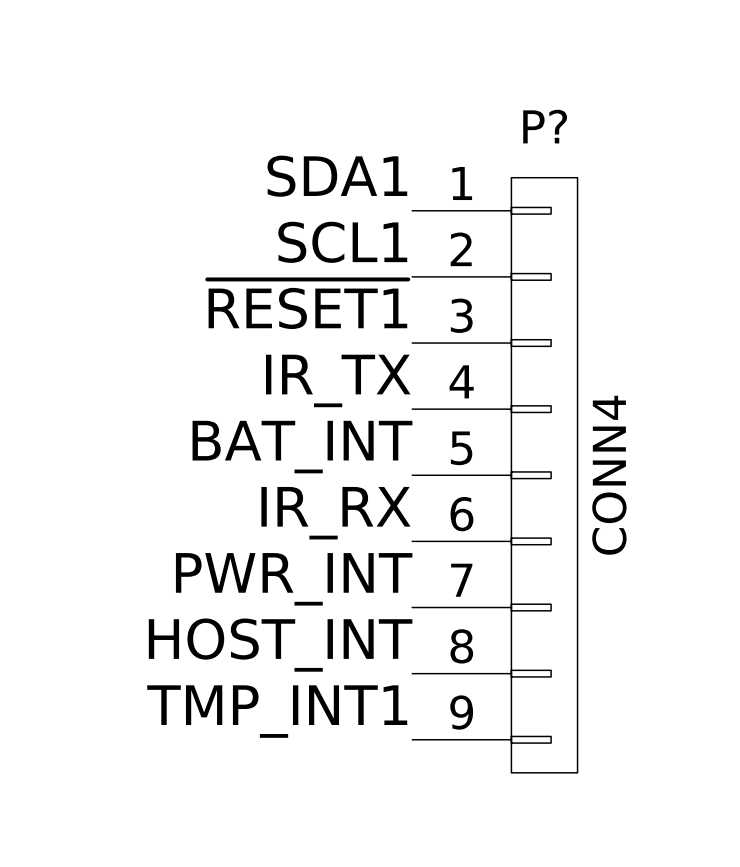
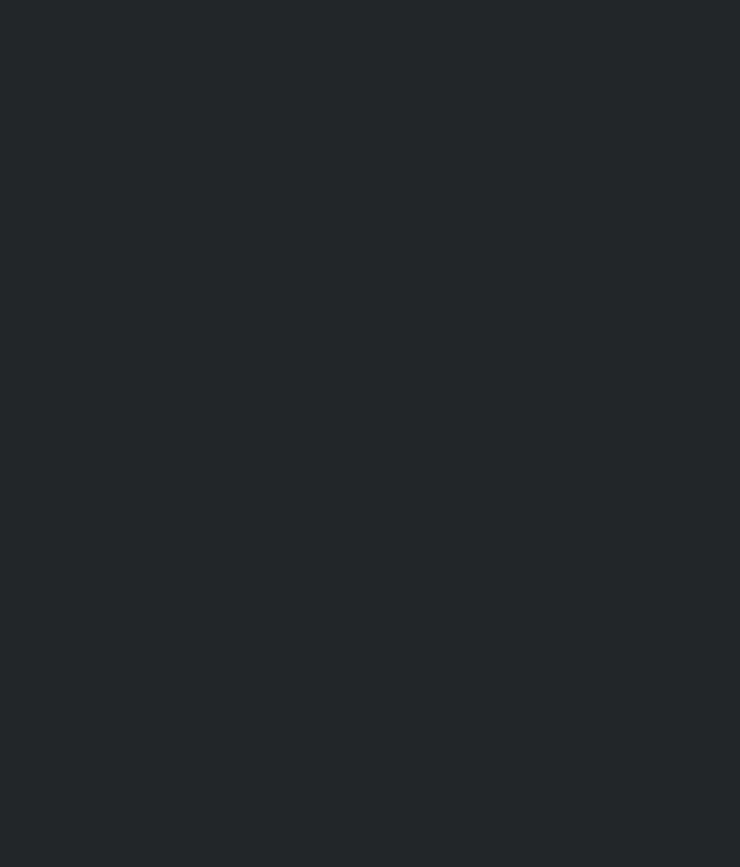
label: SDA1 (337, 176) -> none
label: SCL1 (342, 242) -> none
label: ~{RESET1} (307, 304) -> none
label: IR_TX (338, 380) -> none
label: BAT_INT (302, 447) -> none
P?: CONN4 (494, 475) -> none
label: IR_RX (335, 513) -> none
label: PWR_INT (294, 579) -> none
label: HOST_INT (280, 645) -> none
label: TMP_INT1 (277, 711) -> none

